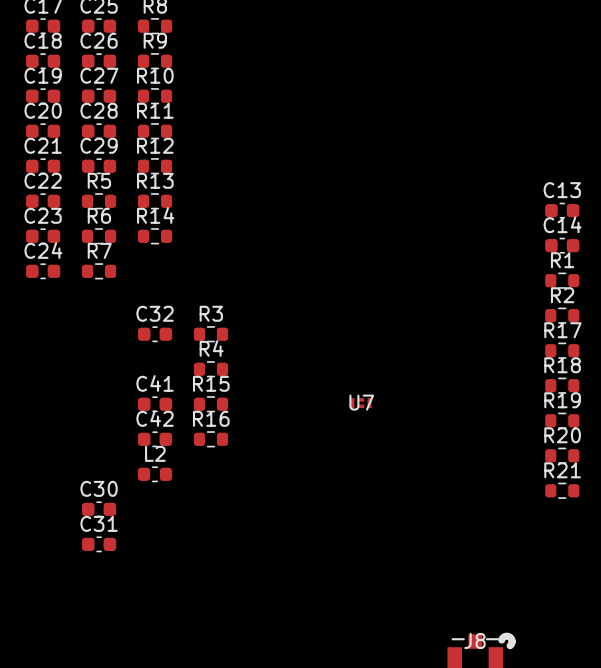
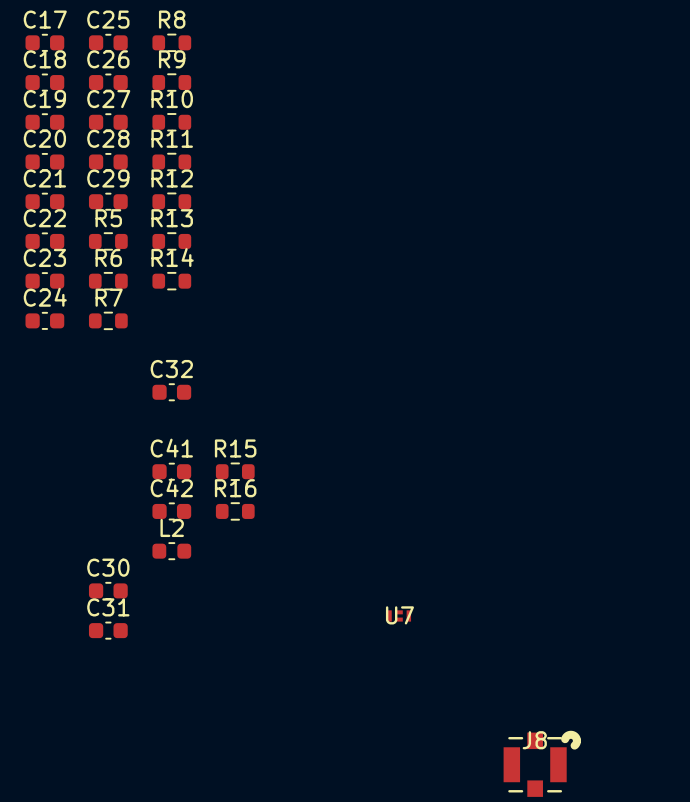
C13: (562, 210) -> none
C14: (562, 245) -> none
R1: (562, 280) -> none
R2: (562, 315) -> none
R3: (210, 334) -> none
R17: (562, 350) -> none
R4: (210, 369) -> none
R18: (562, 385) -> none
U7 position: (361, 403) -> (399, 615)
R19: (562, 420) -> none
R20: (562, 455) -> none
R21: (562, 490) -> none

